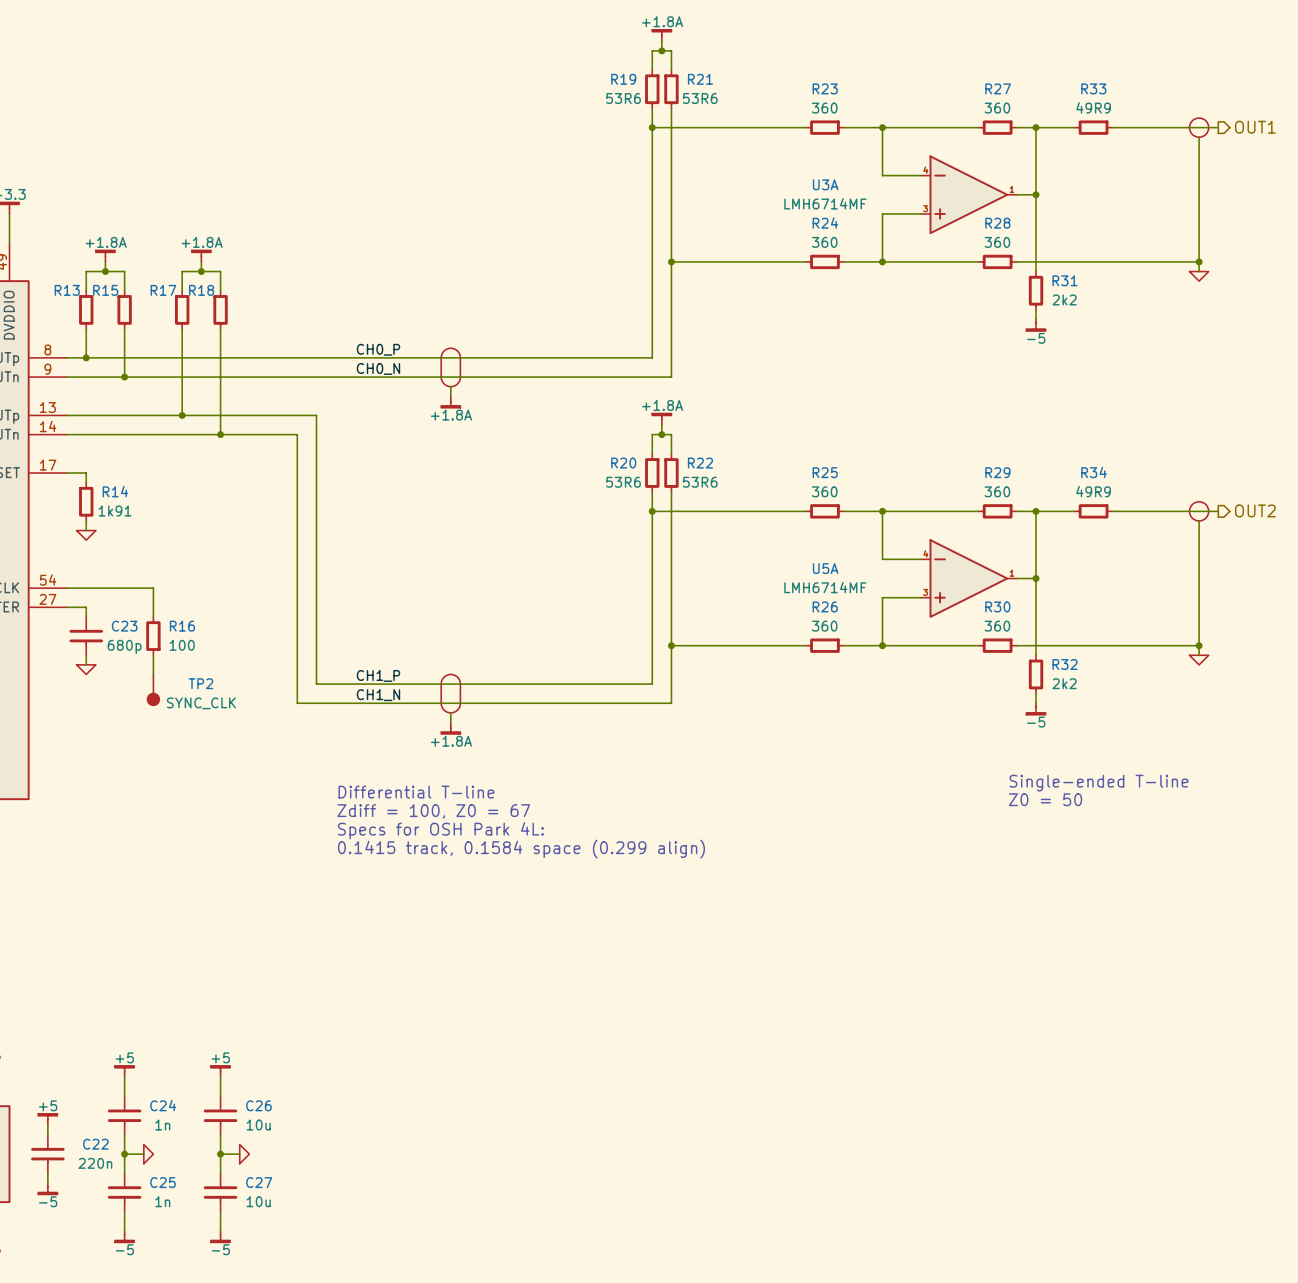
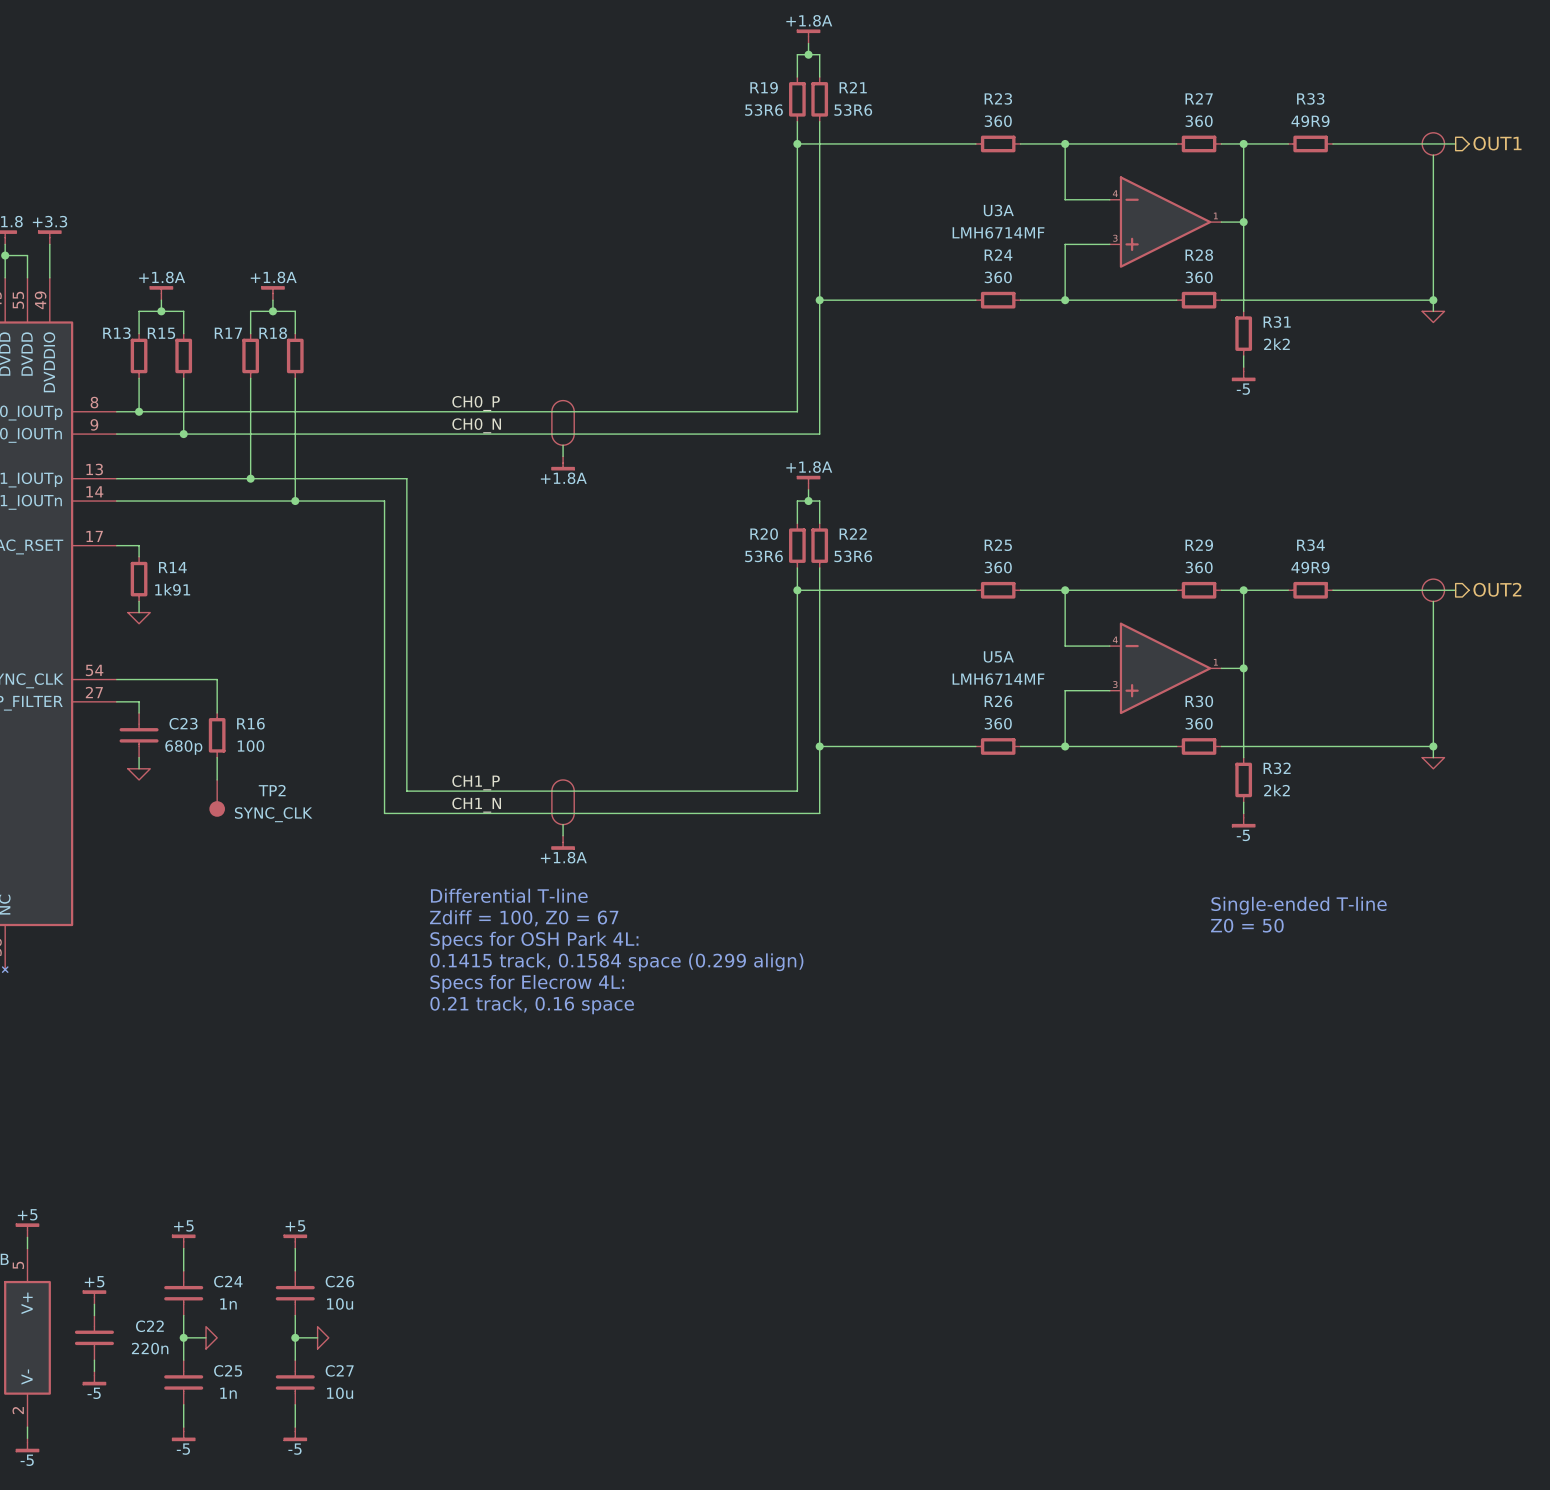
text: none -> Differential T-line (509, 895)
text: Differential T-line (416, 792) -> Zdiff = 100, Z0 = 67 (524, 918)
text: Zdiff = 100, Z0 = 67 (433, 811) -> Specs for OSH Park 4L: (534, 940)
text: Specs for OSH Park 4L: (440, 830) -> 0.1415 track, 0.1584 space (0.299 align) (616, 962)
text: 0.1415 track, 0.1584 space (0.299 align) (521, 849) -> Specs for Elecrow 4L: (527, 983)
text: none -> 0.21 track, 0.16 space (532, 1005)

